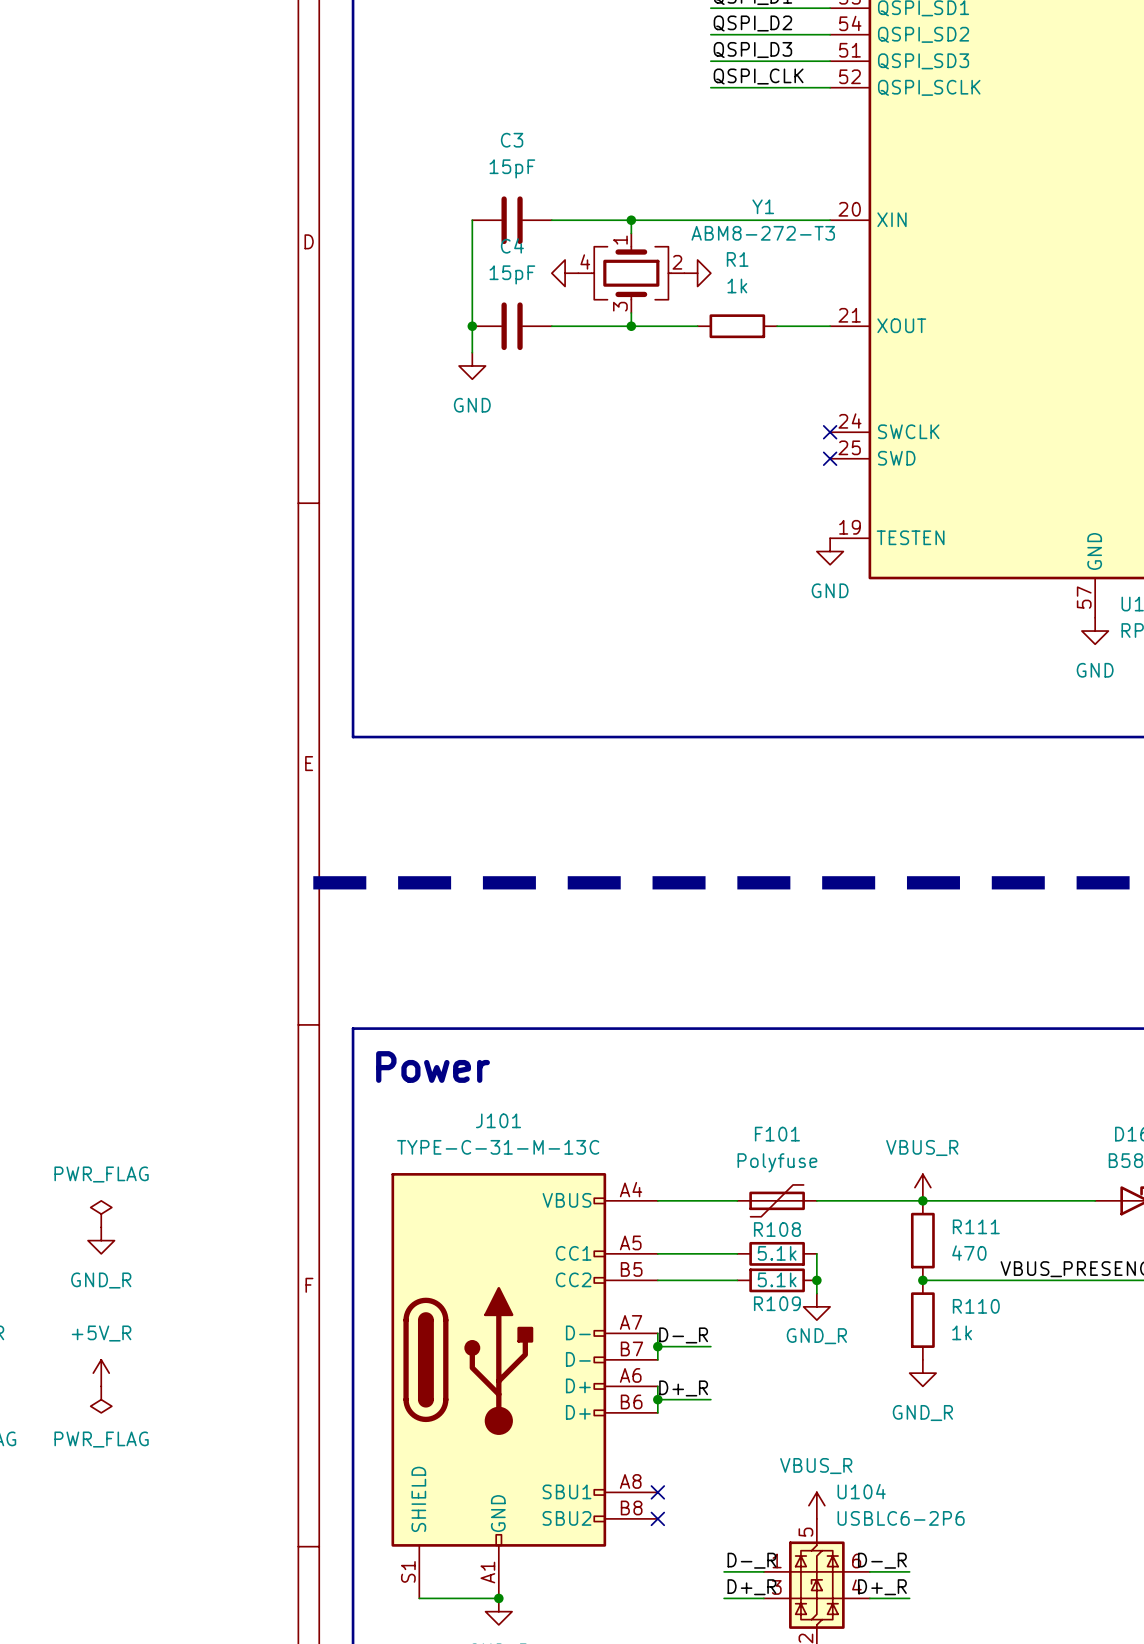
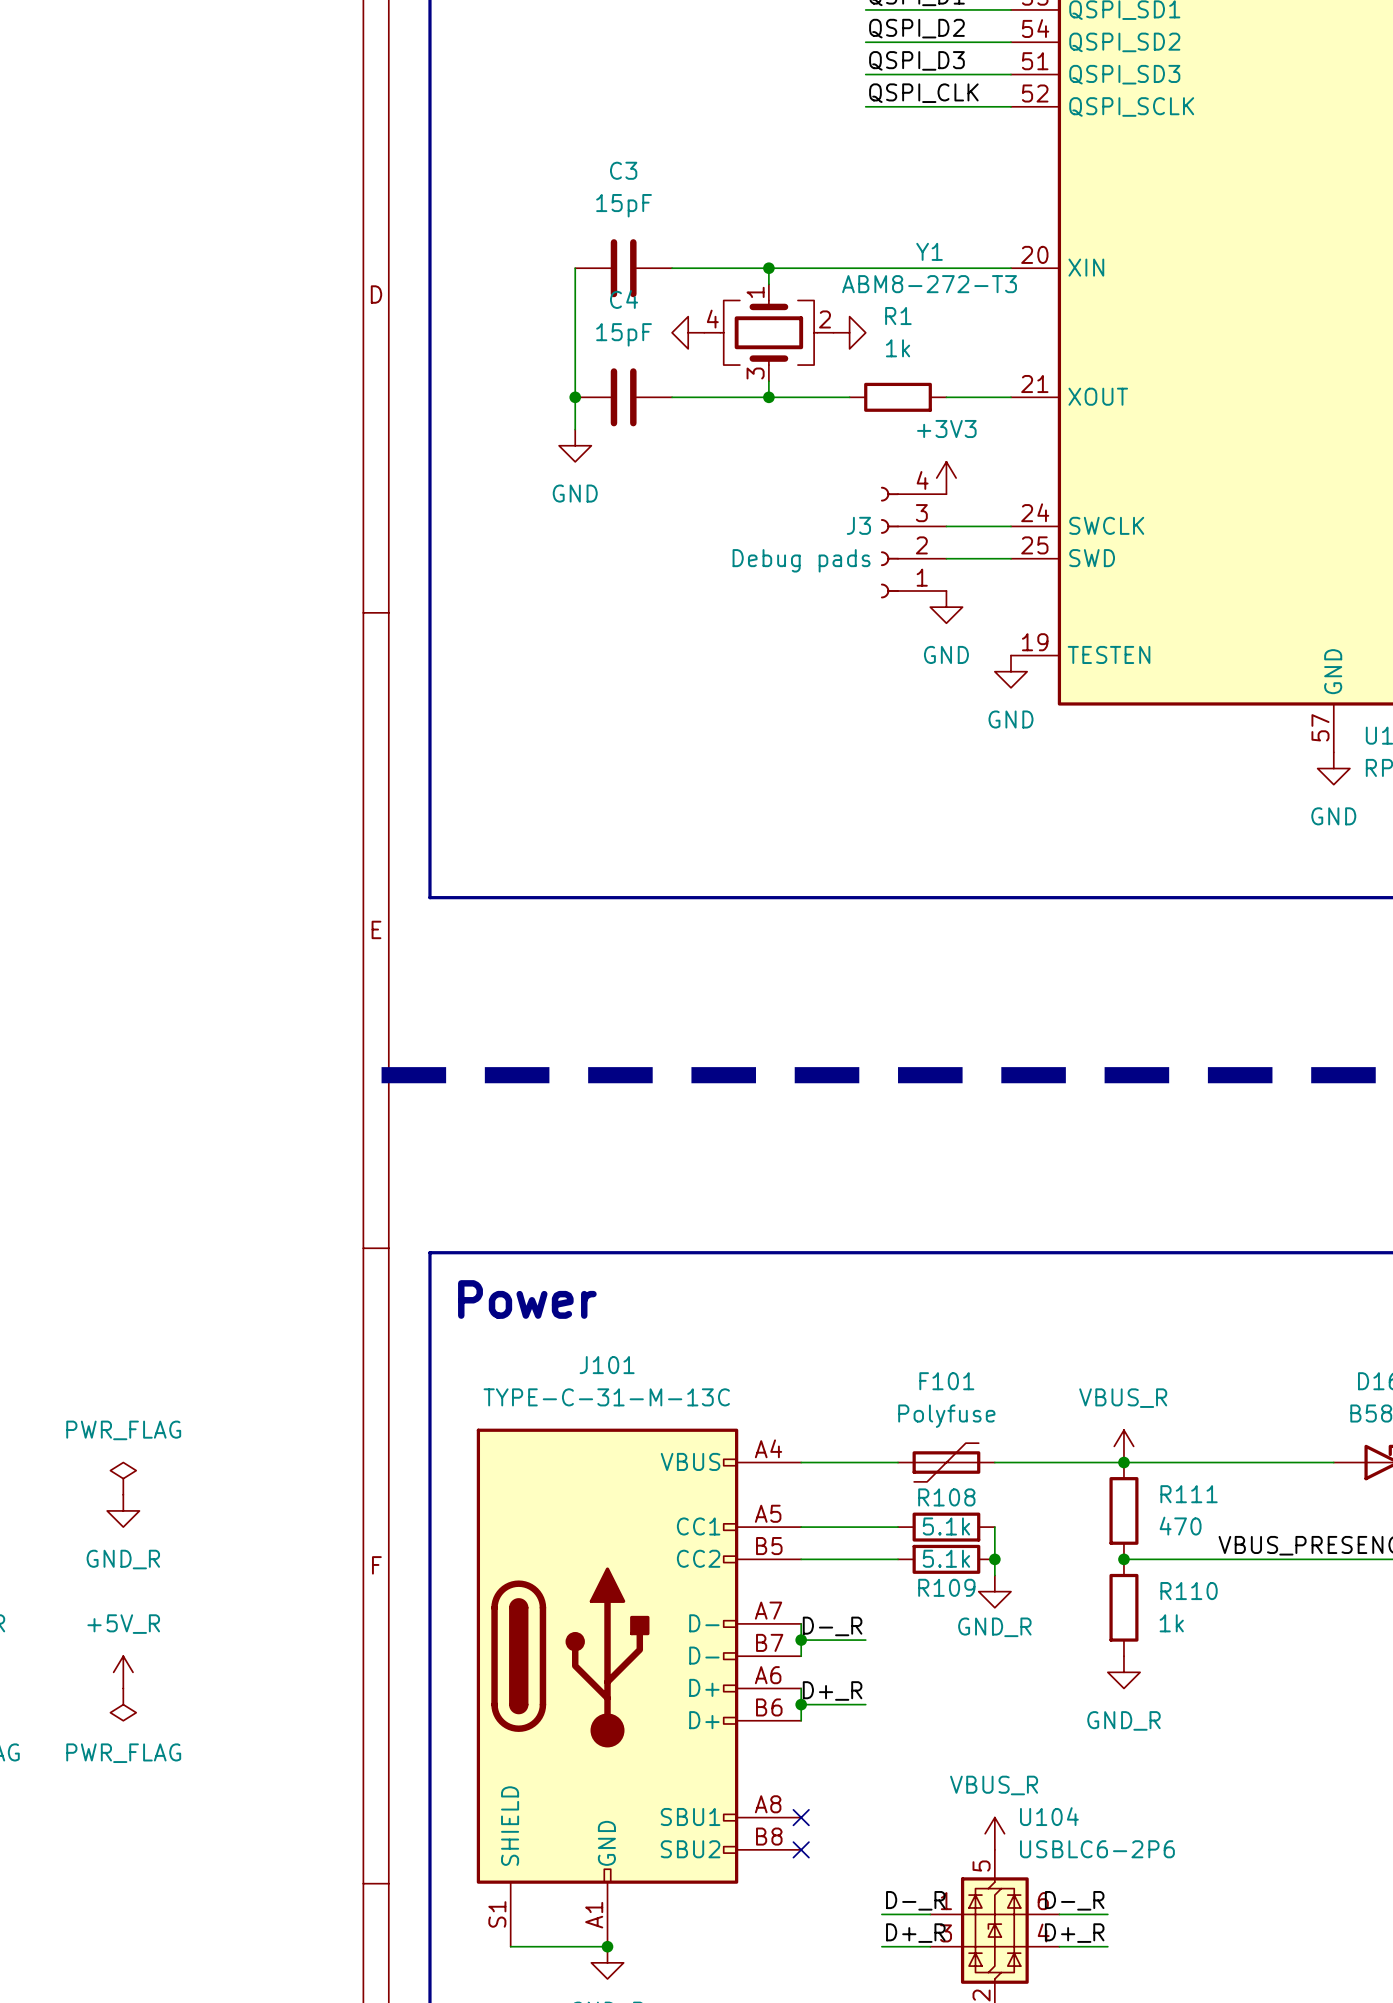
power symbol: none -> +3V3 (946, 478)
wire: none -> (946, 526) (1011, 526)
no-connect mark: (830, 432) -> none
J3: none -> Debug pads (913, 542)
wire: none -> (946, 558) (1011, 558)
no-connect mark: (830, 458) -> none
power symbol: none -> GND (946, 607)

